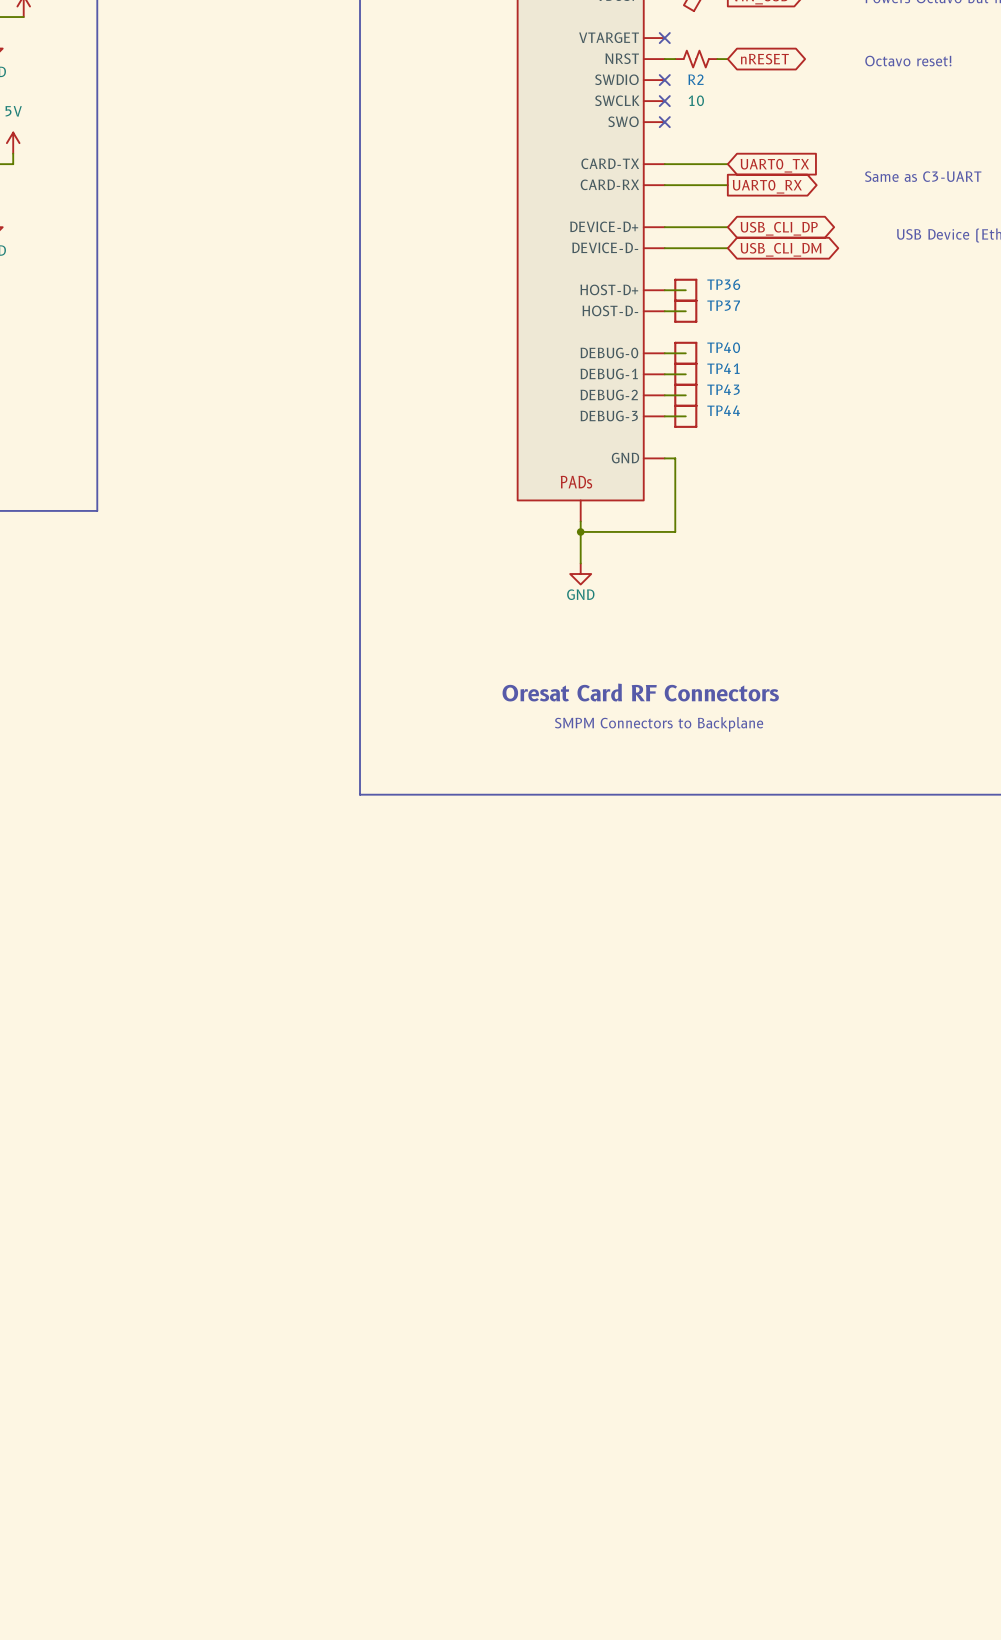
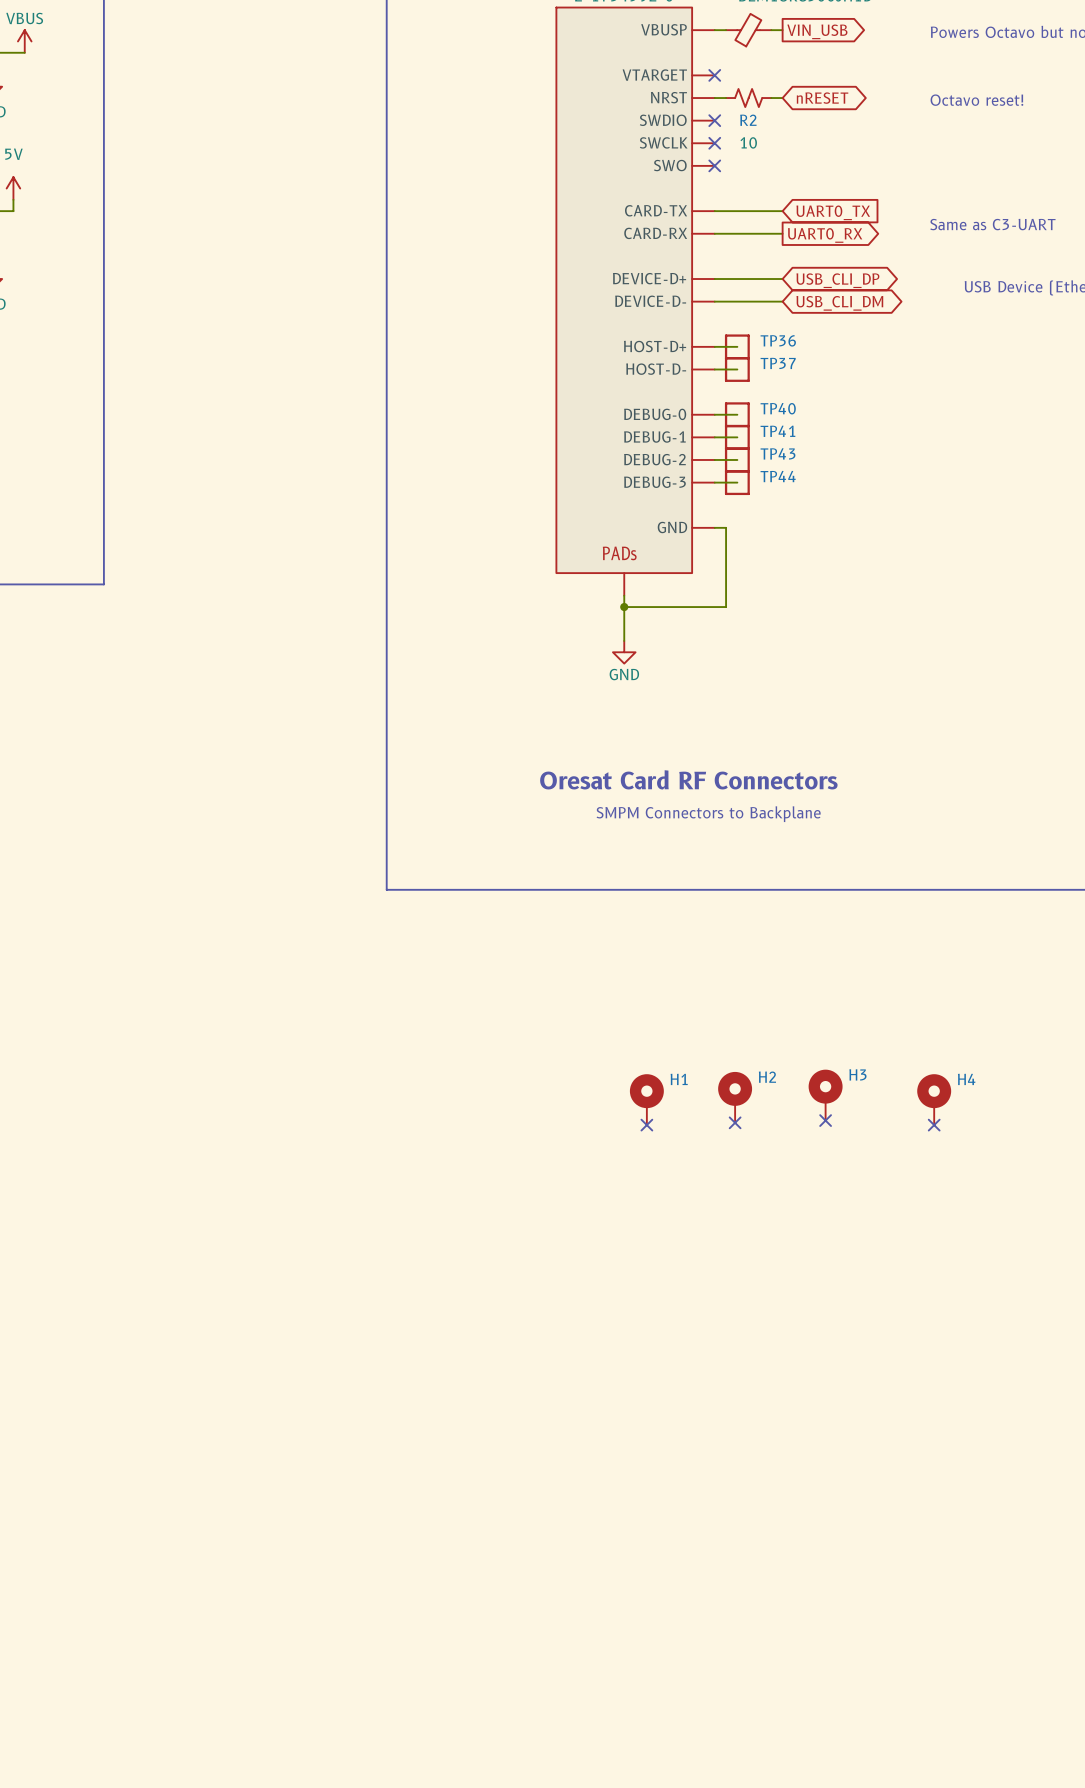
H3: none -> (825, 1095)
H2: none -> (735, 1097)
H1: none -> (646, 1099)
H4: none -> (934, 1099)
no-connect mark: none -> (825, 1120)
no-connect mark: none -> (735, 1122)
no-connect mark: none -> (646, 1125)
no-connect mark: none -> (934, 1125)

